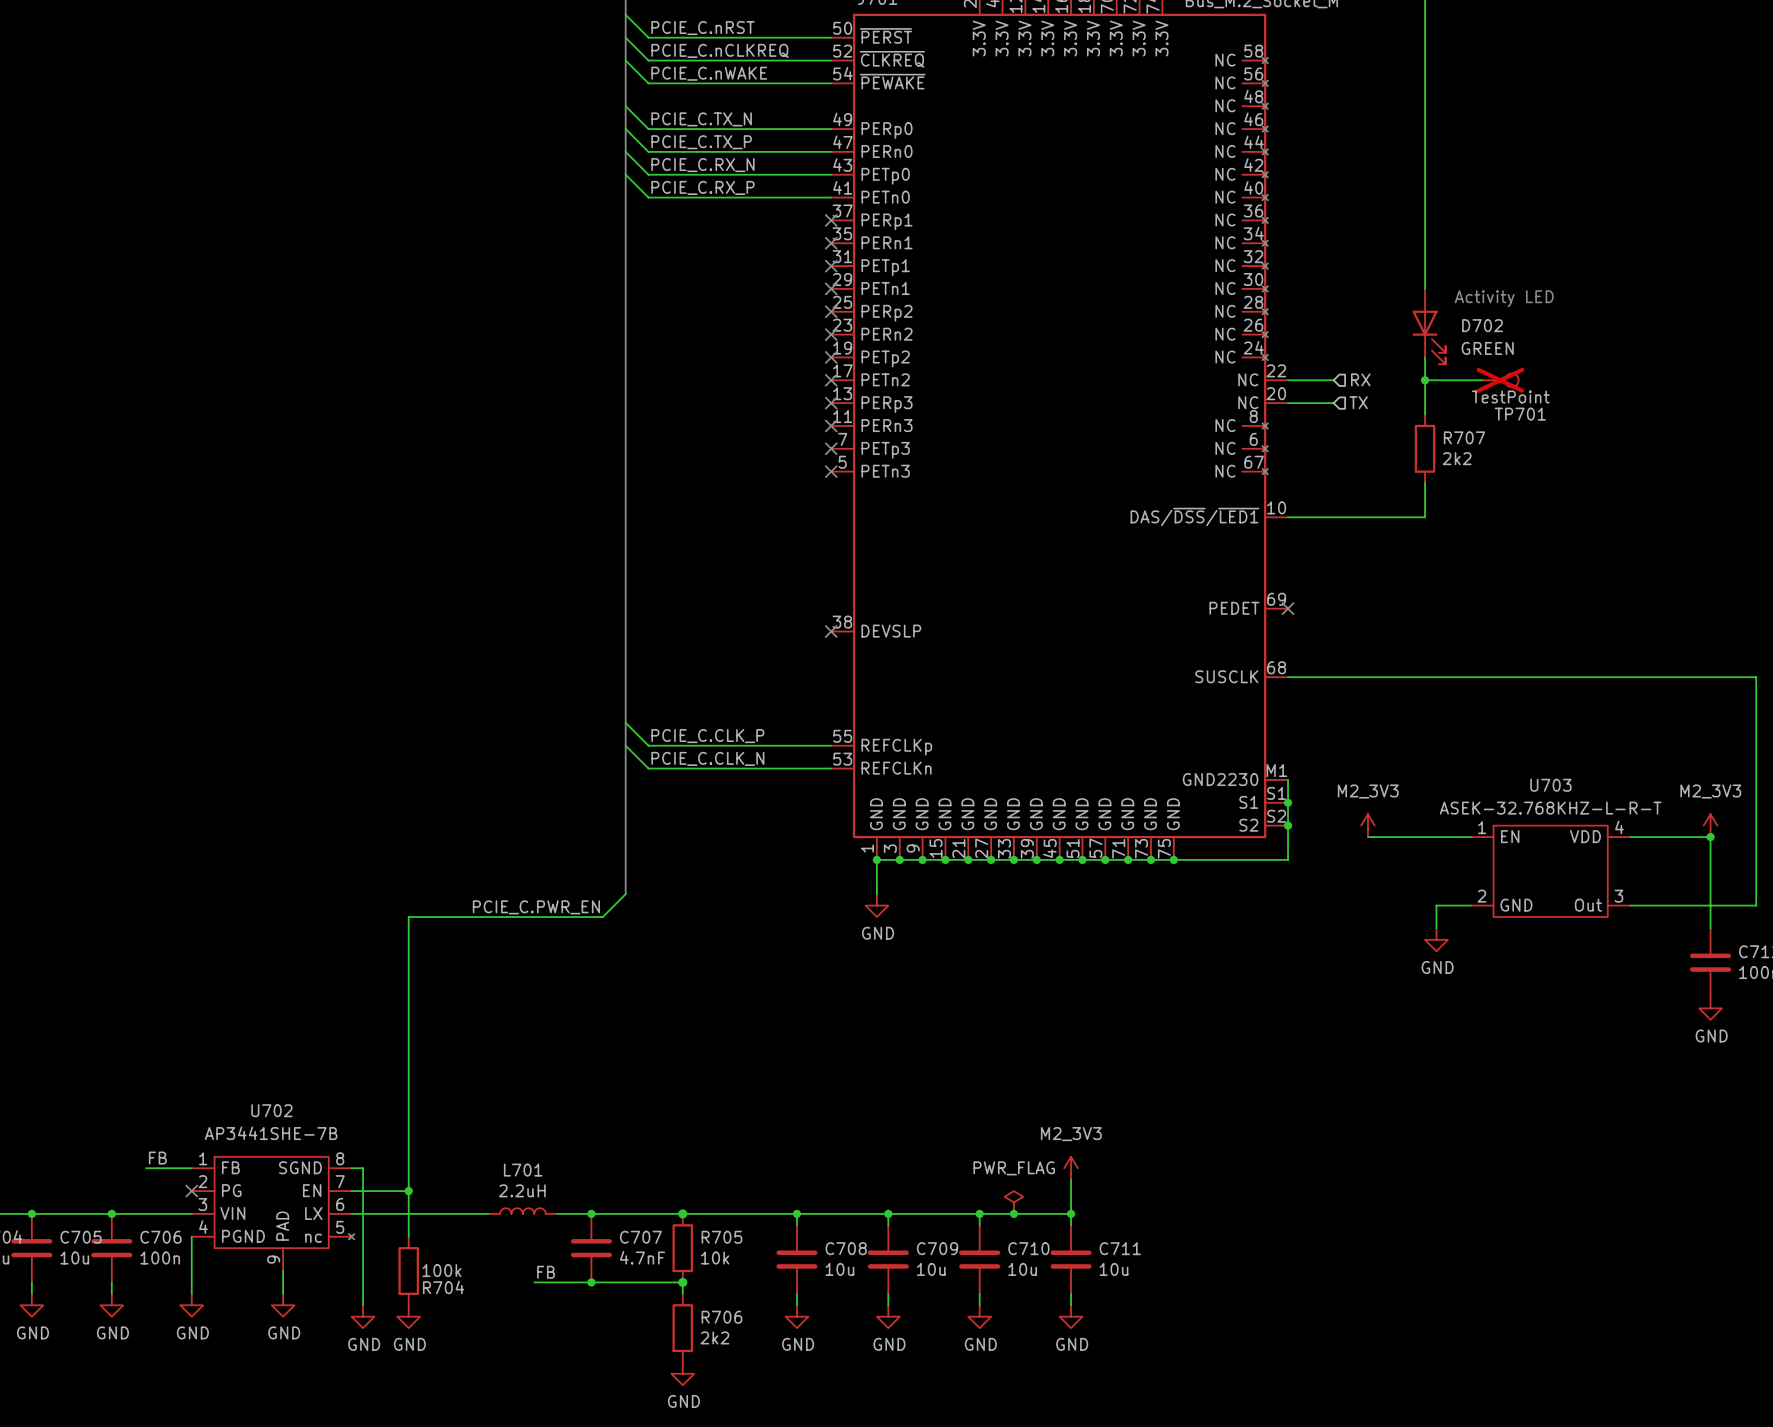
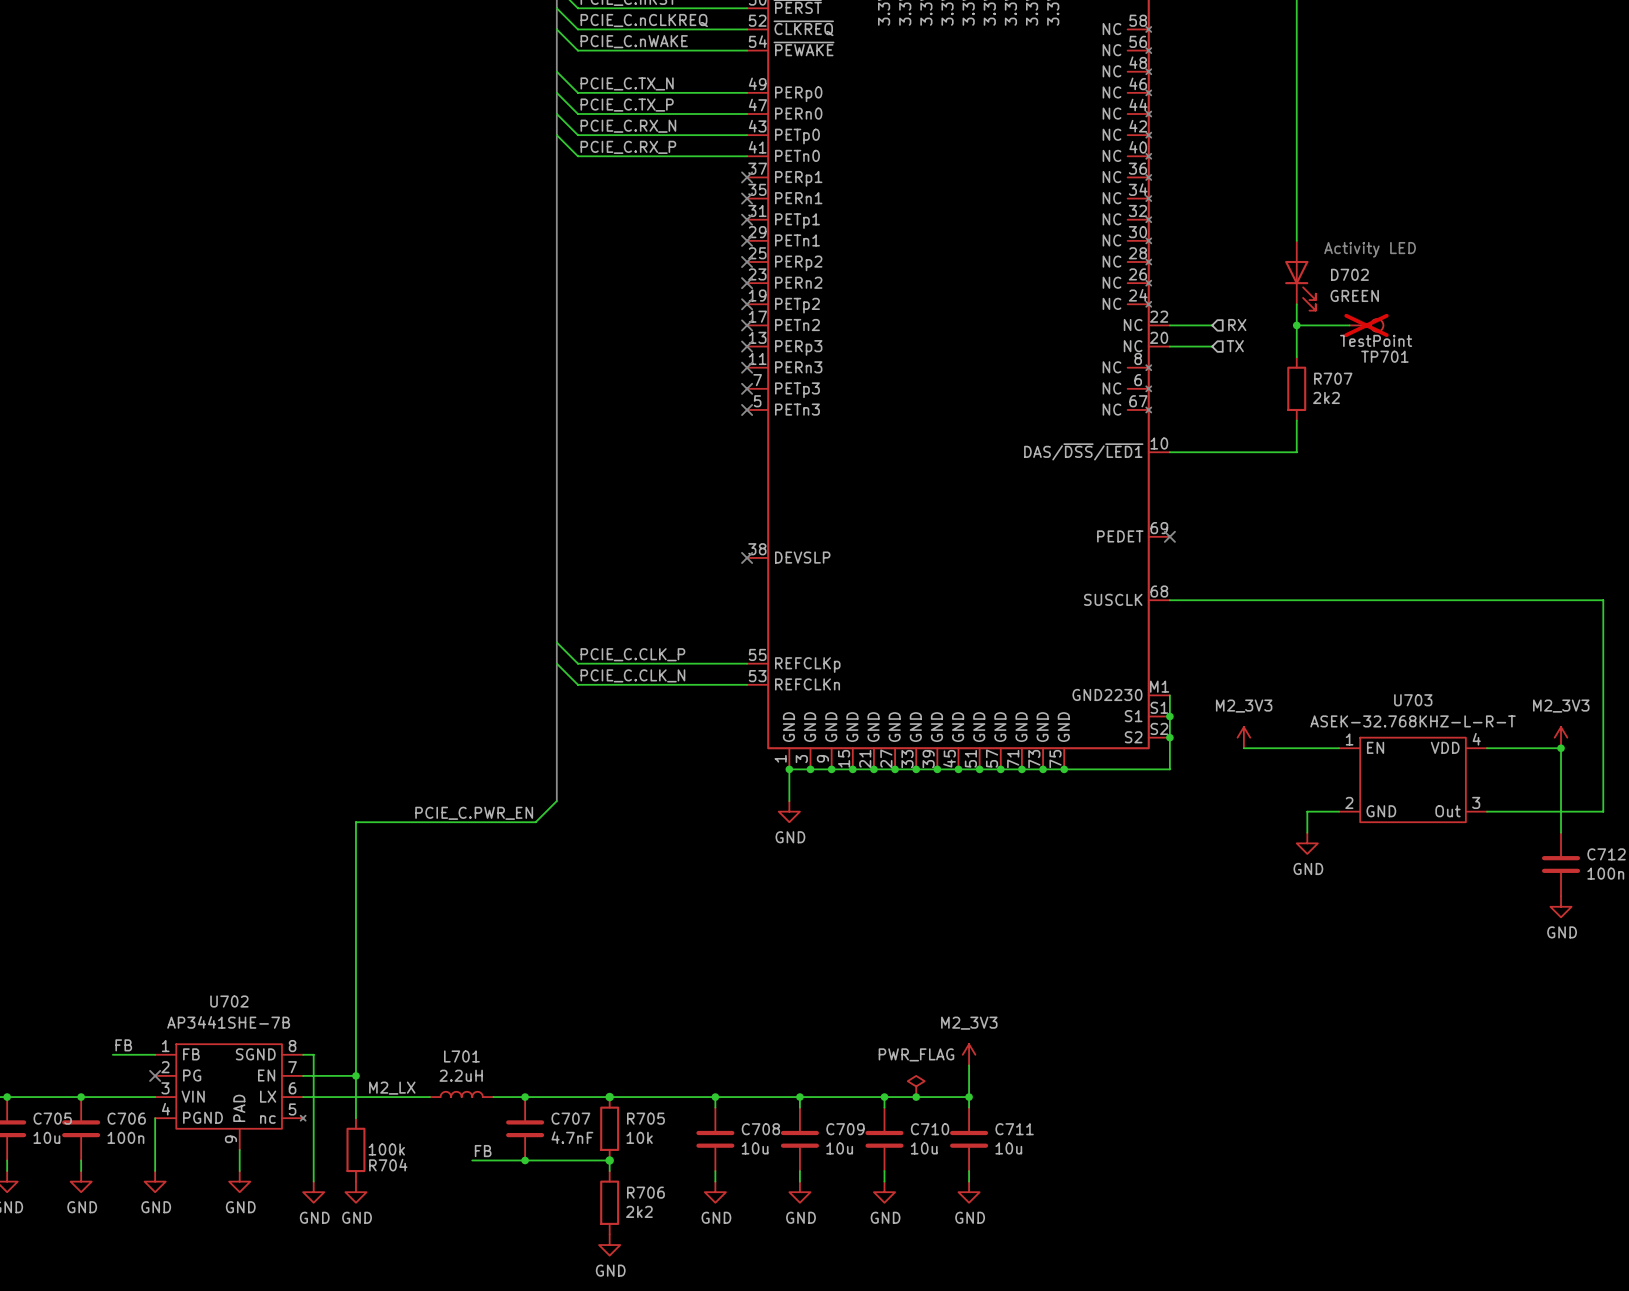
label: none -> M2_LX (392, 1088)

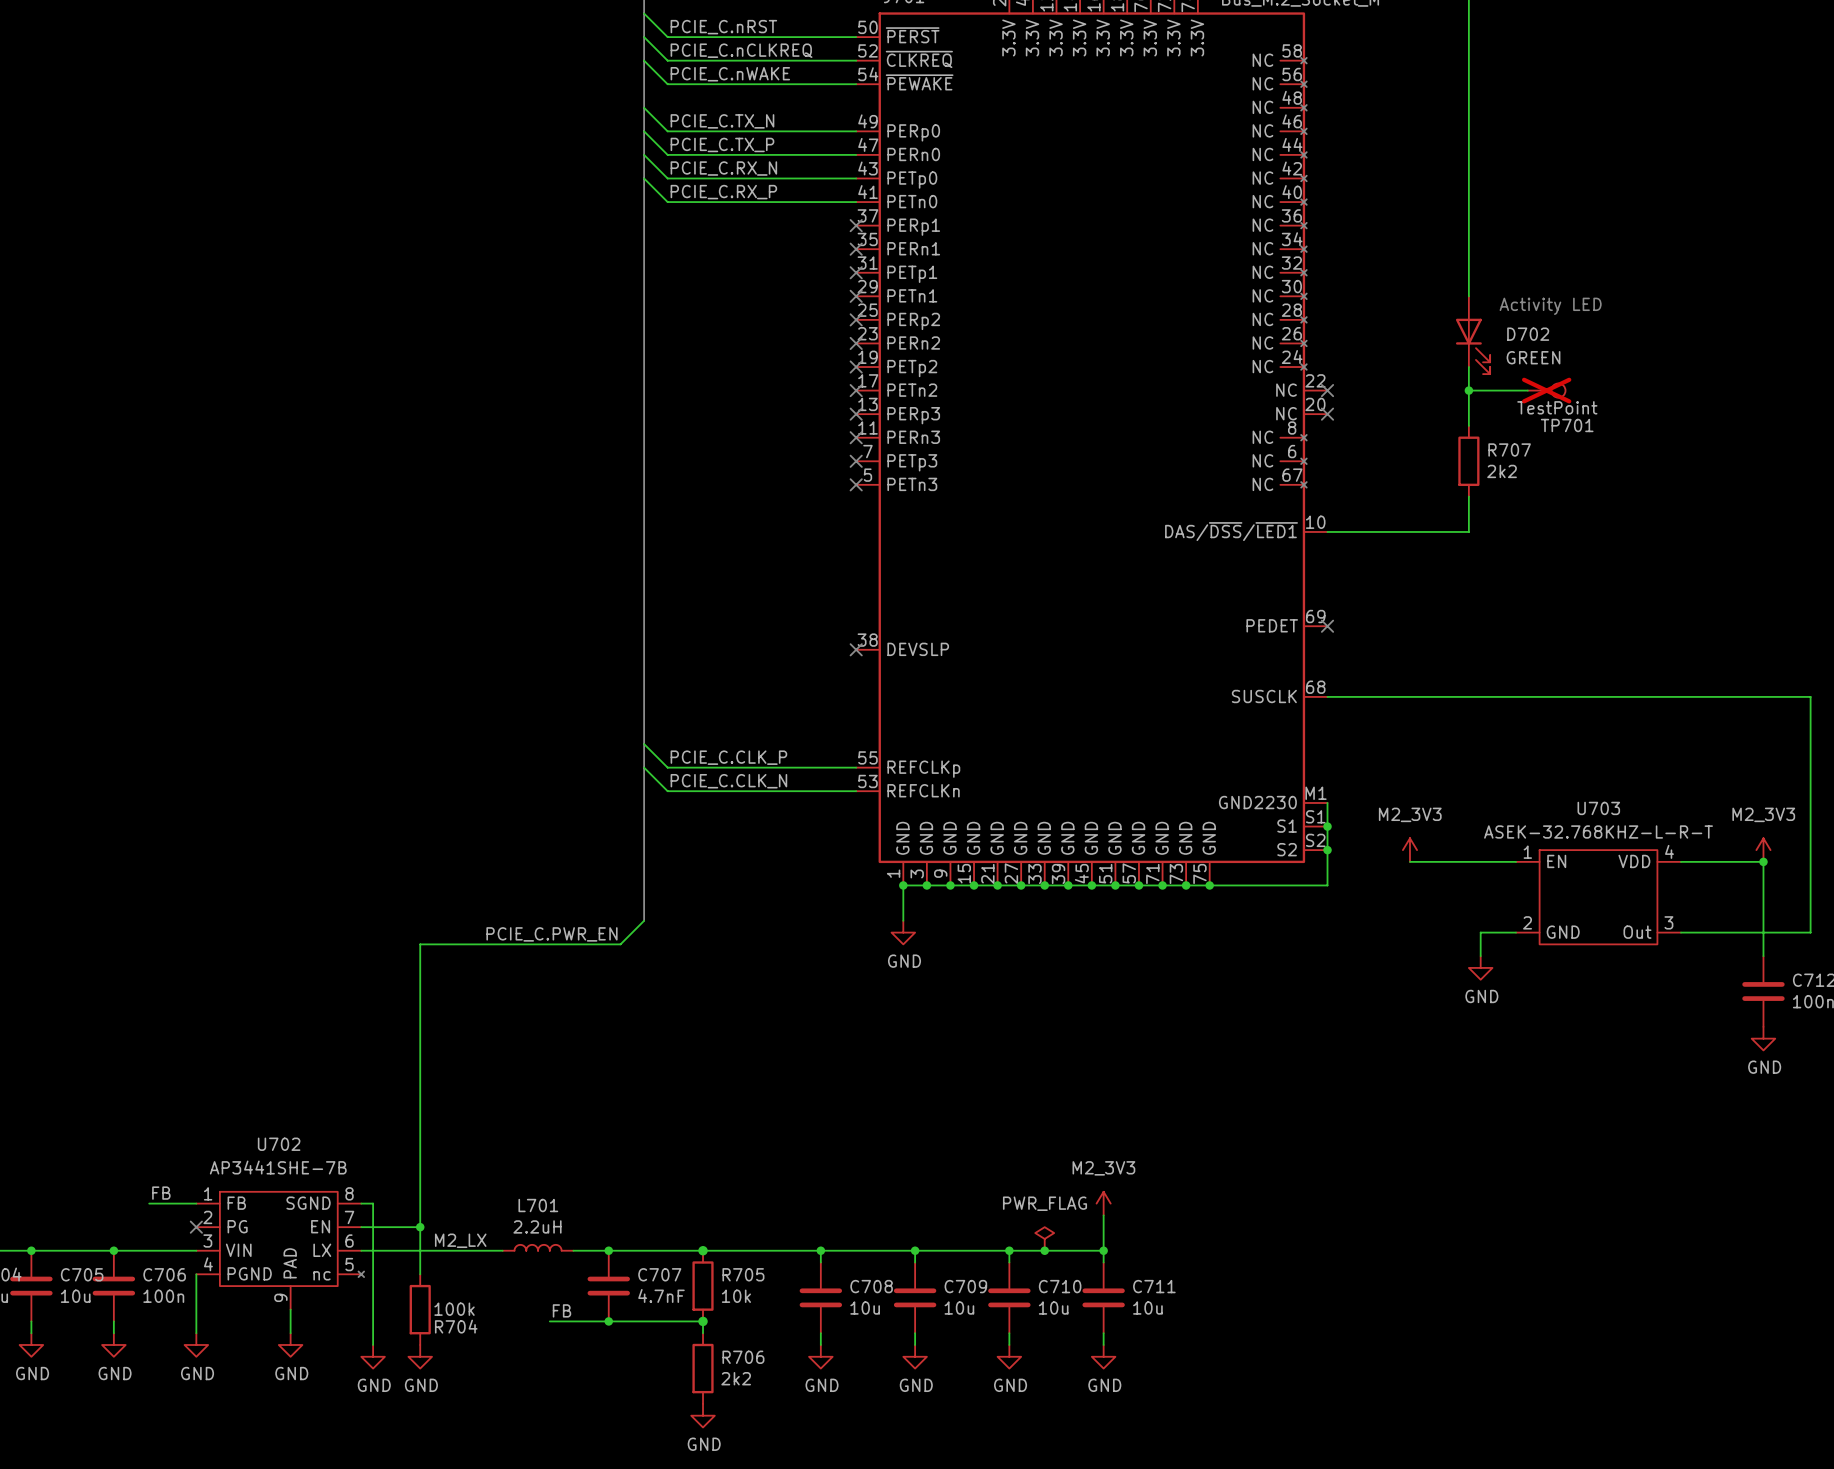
wire: (1169, 325) (1212, 325) -> none
no-connect mark: none -> (1327, 390)
hierarchical label: RX (1237, 325) -> none
wire: (1169, 346) (1212, 346) -> none
no-connect mark: none -> (1327, 414)
hierarchical label: TX (1235, 346) -> none

